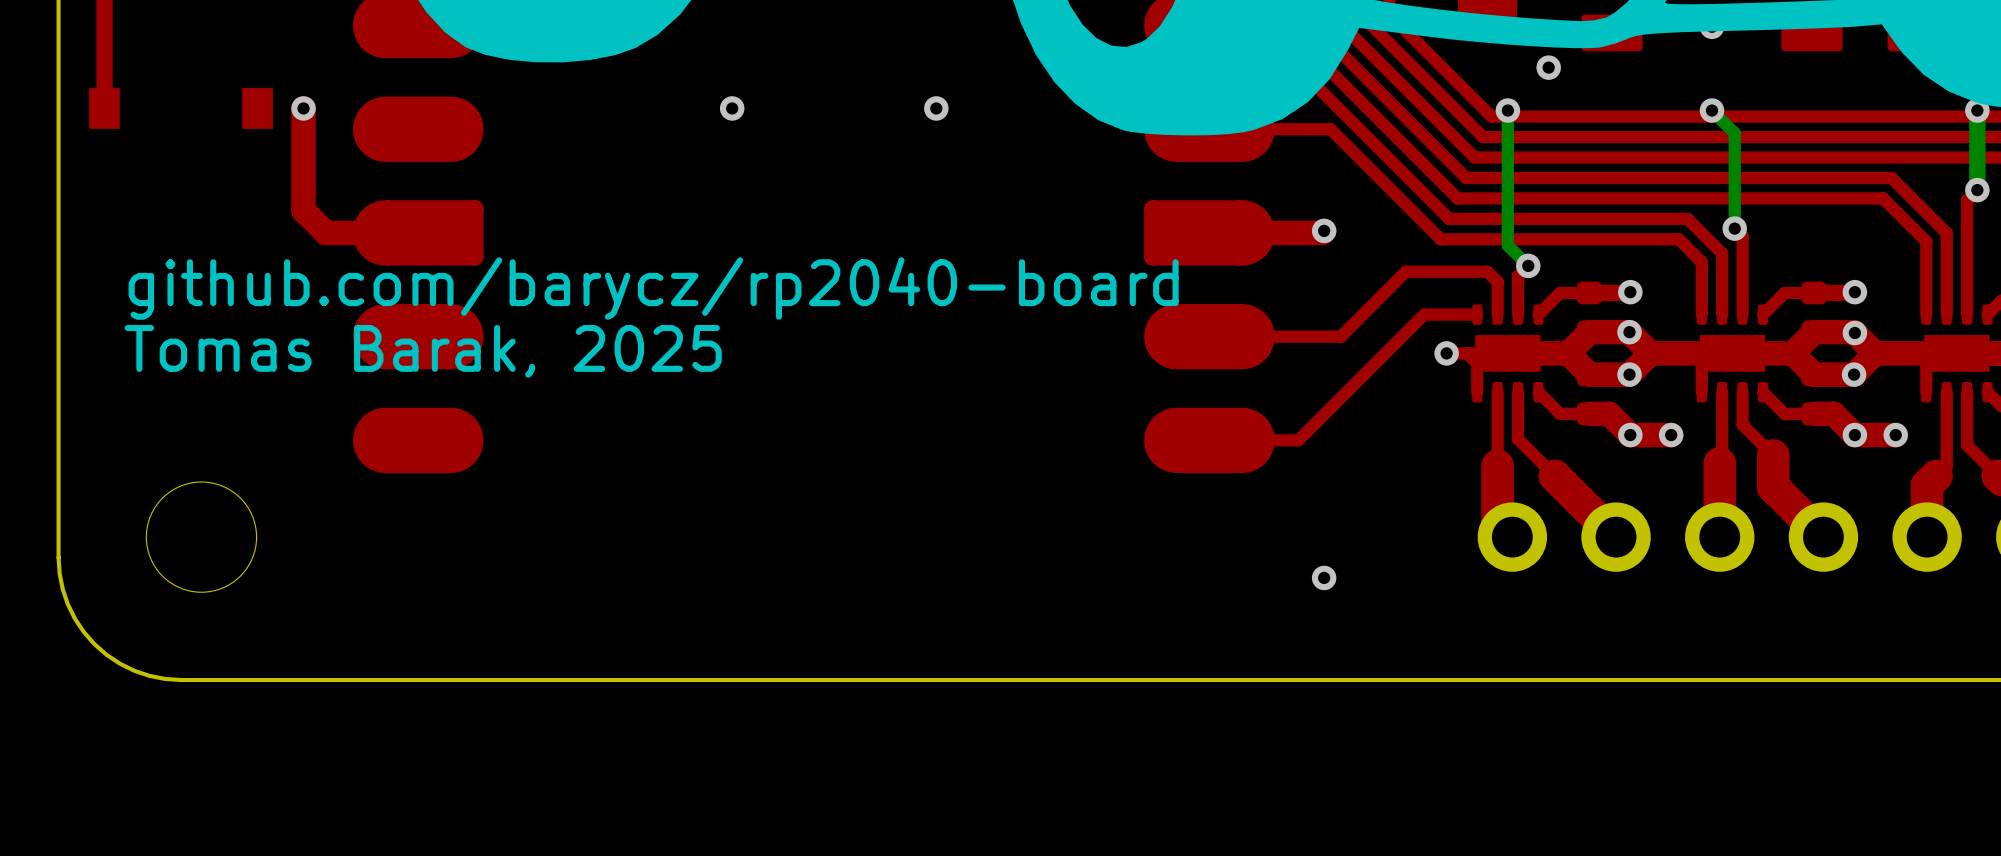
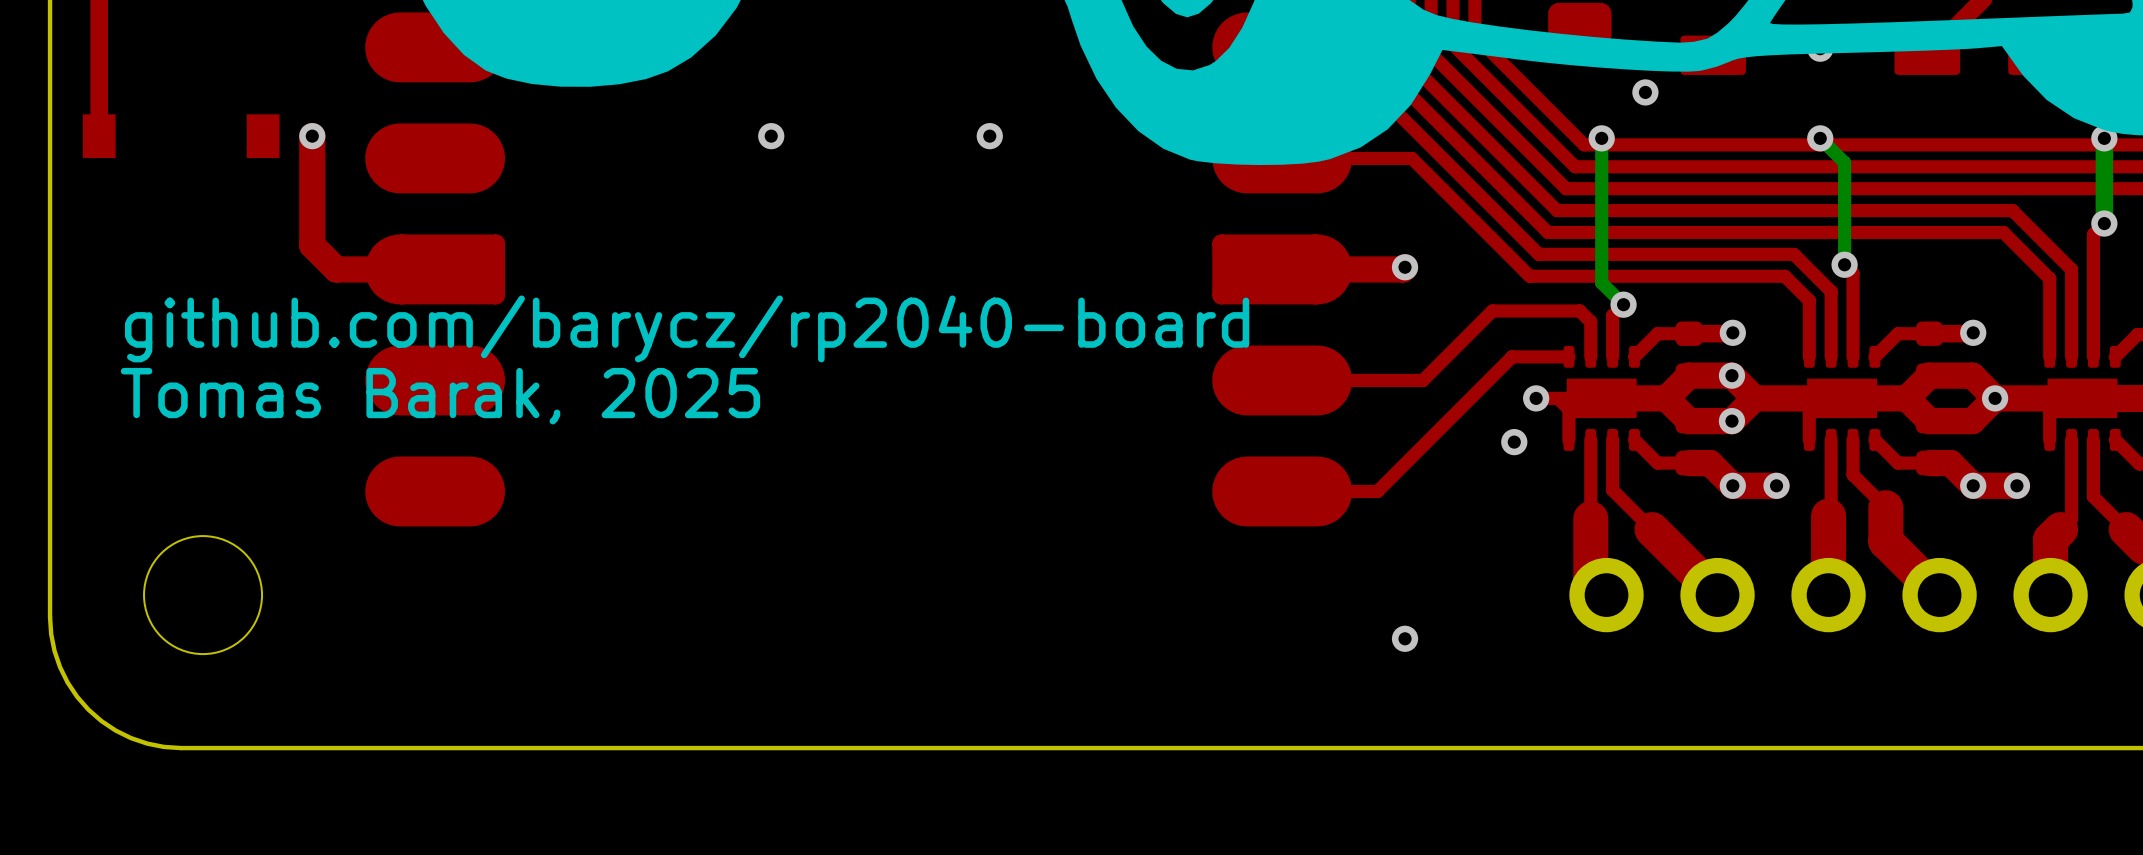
via: (1854, 332) -> none
via: none -> (1995, 398)
via: (1854, 374) -> none
via: none -> (1514, 442)

